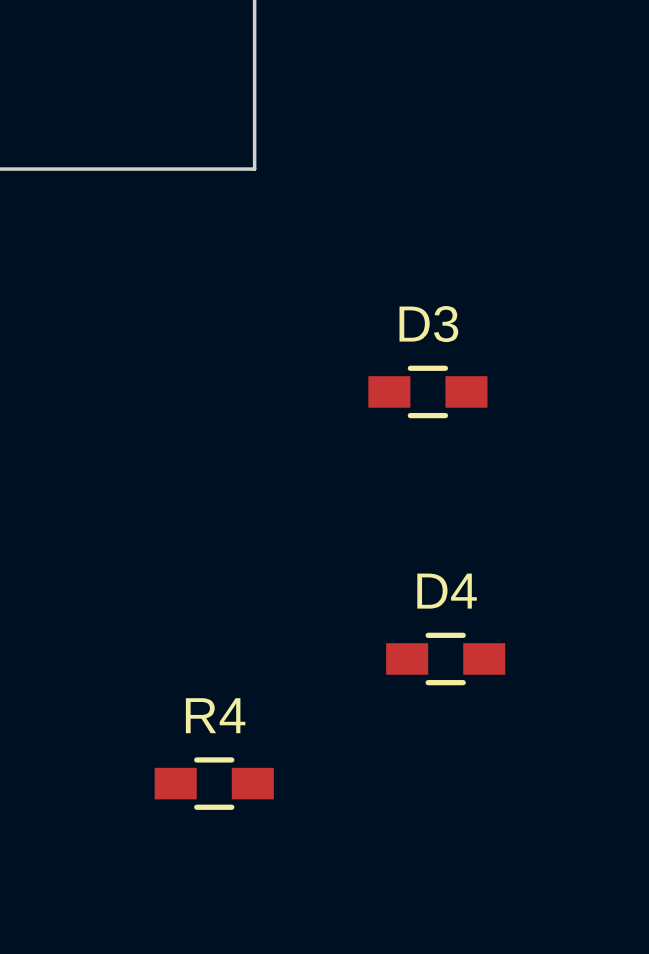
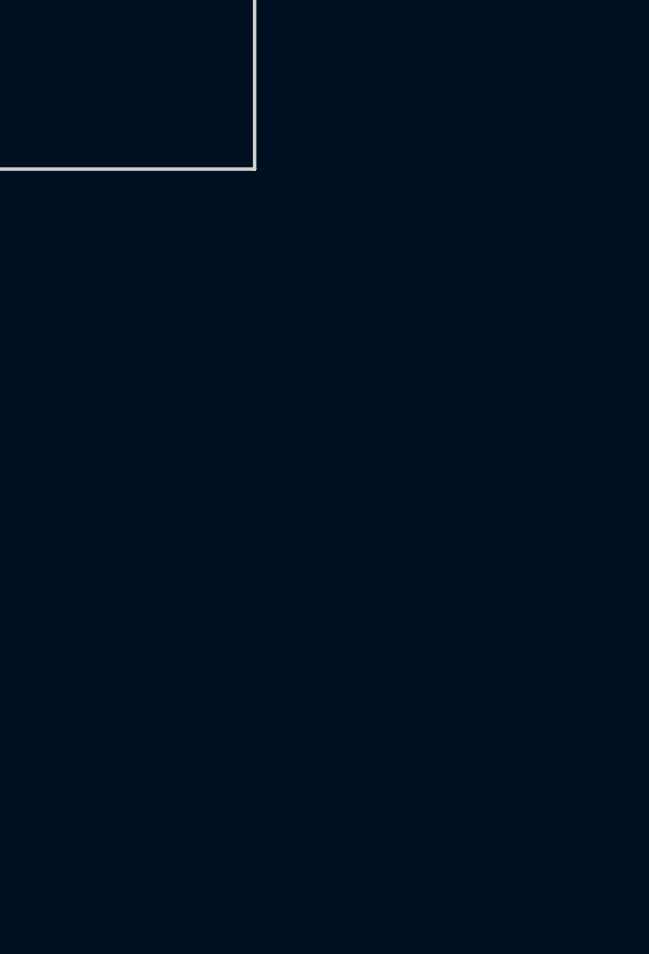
D3: (427, 391) -> none
D4: (445, 658) -> none
R4: (214, 783) -> none

